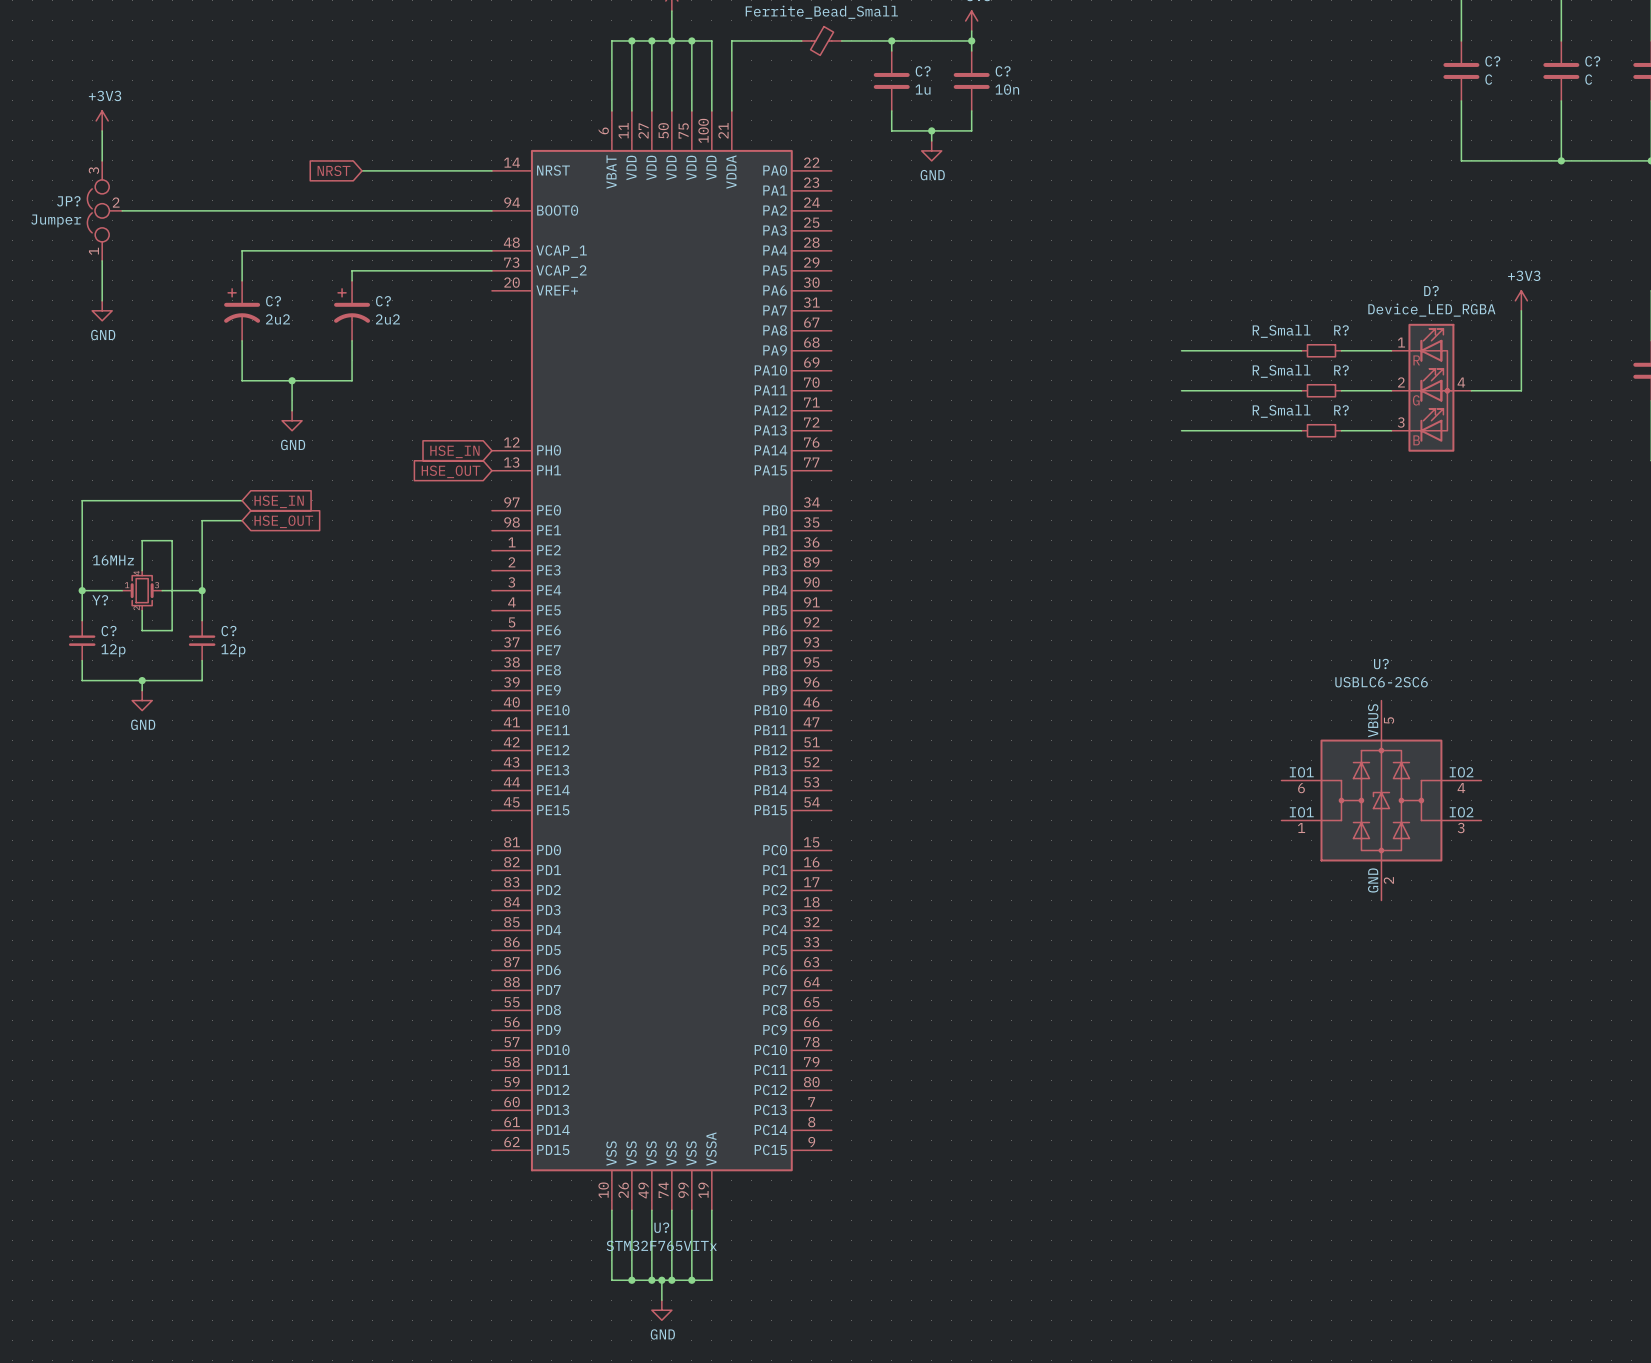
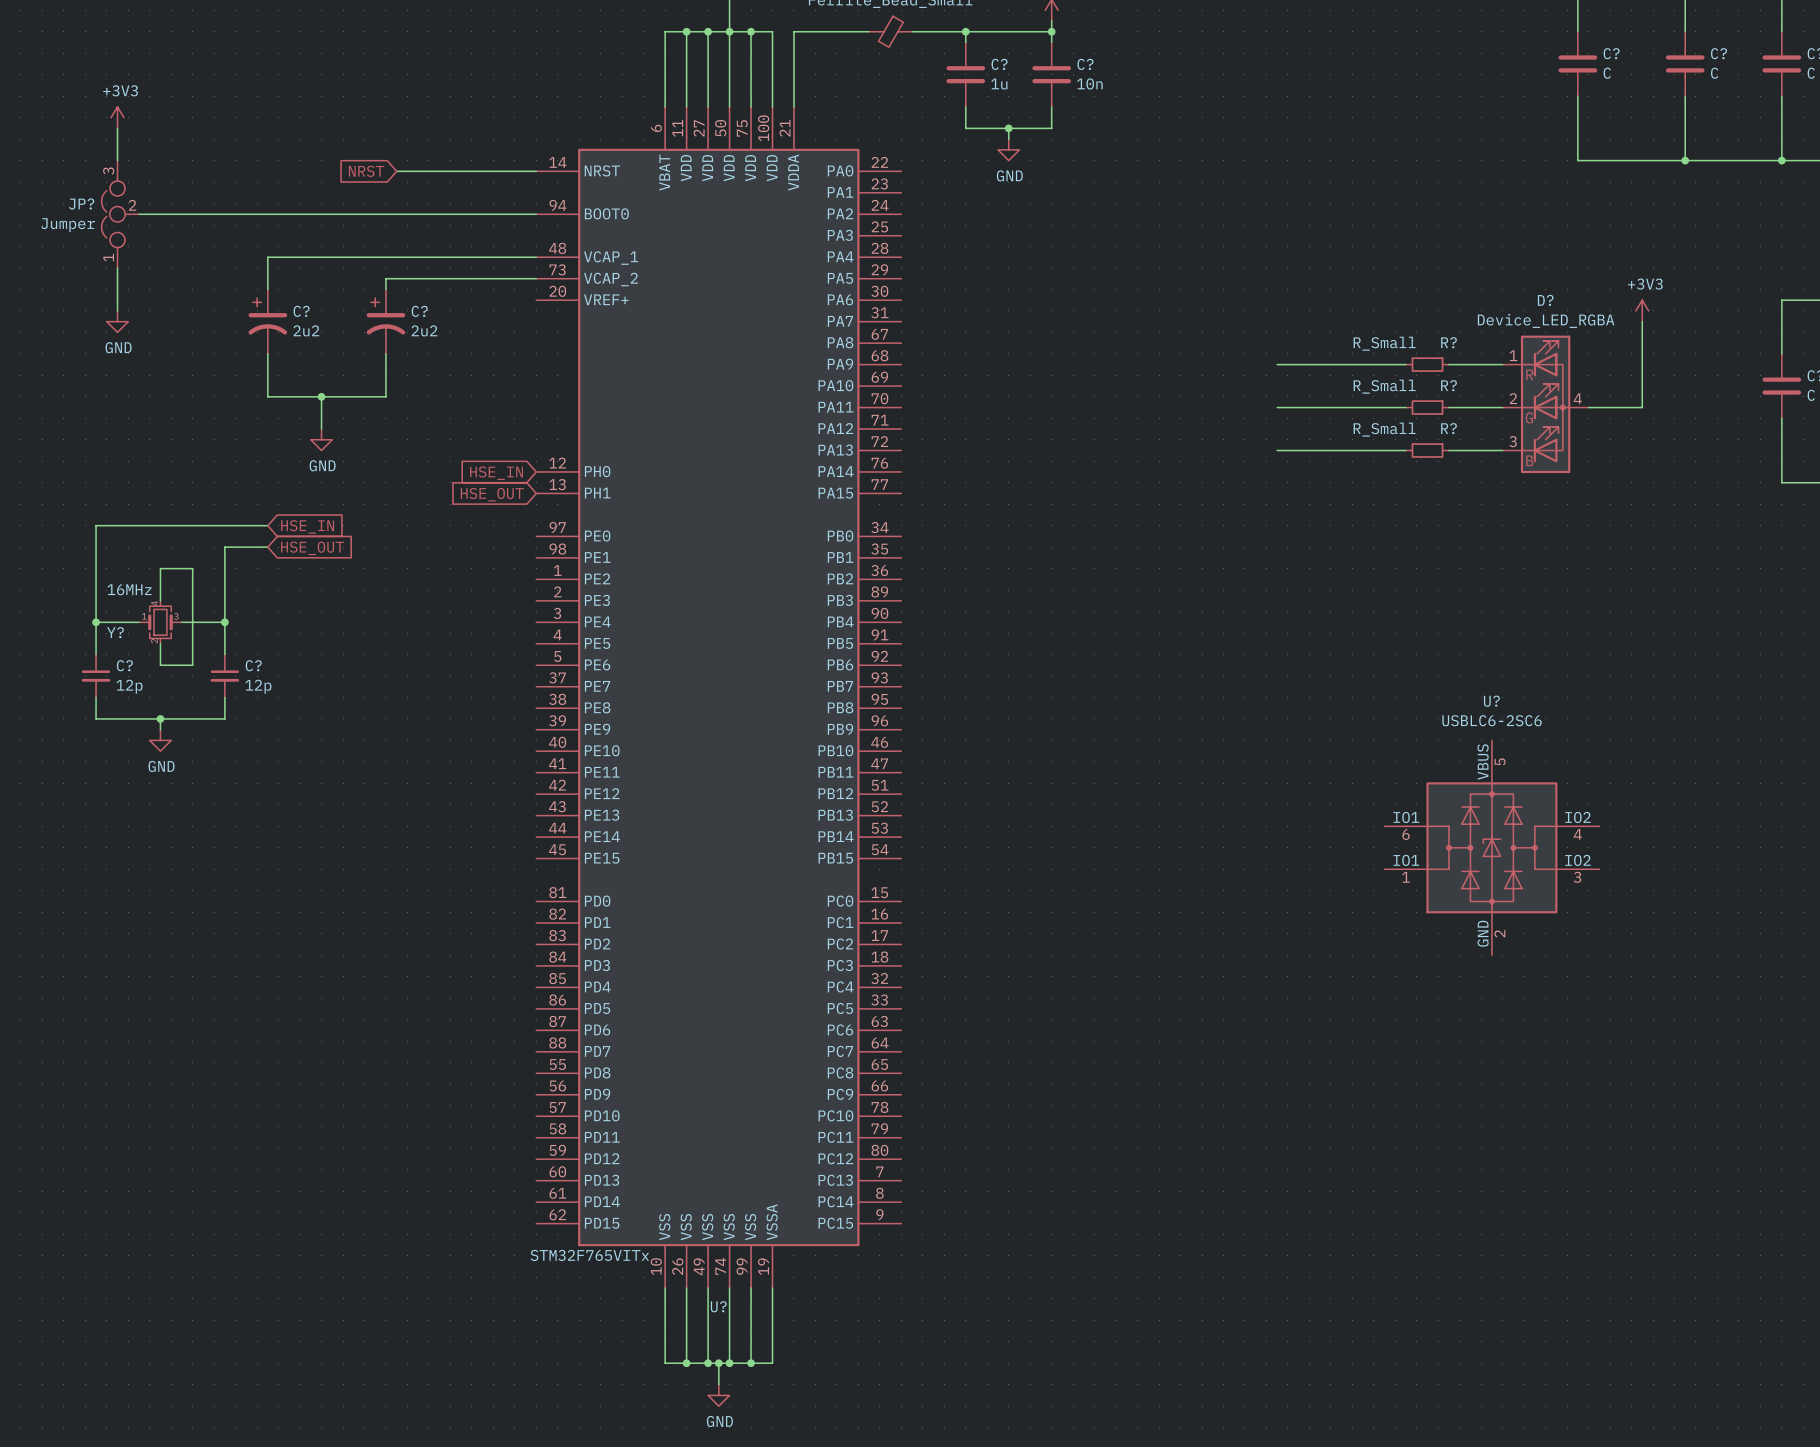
U? value position: STM32F765VITx (661, 1245) -> STM32F765VITx (589, 1255)

